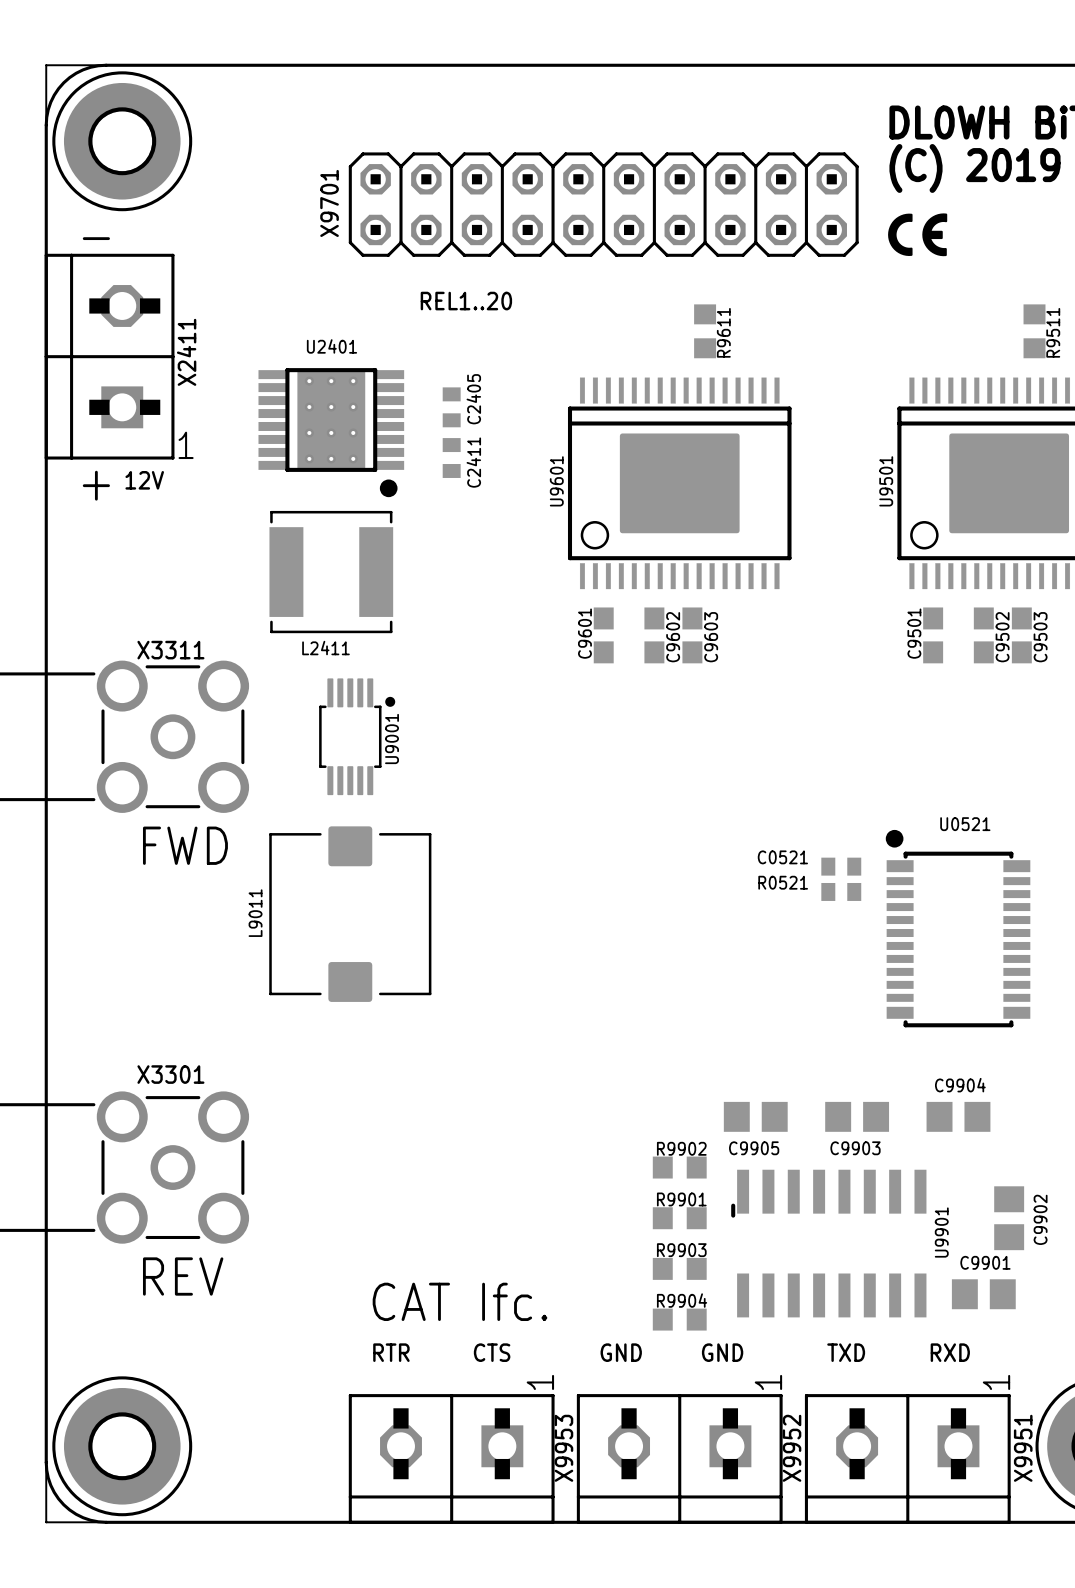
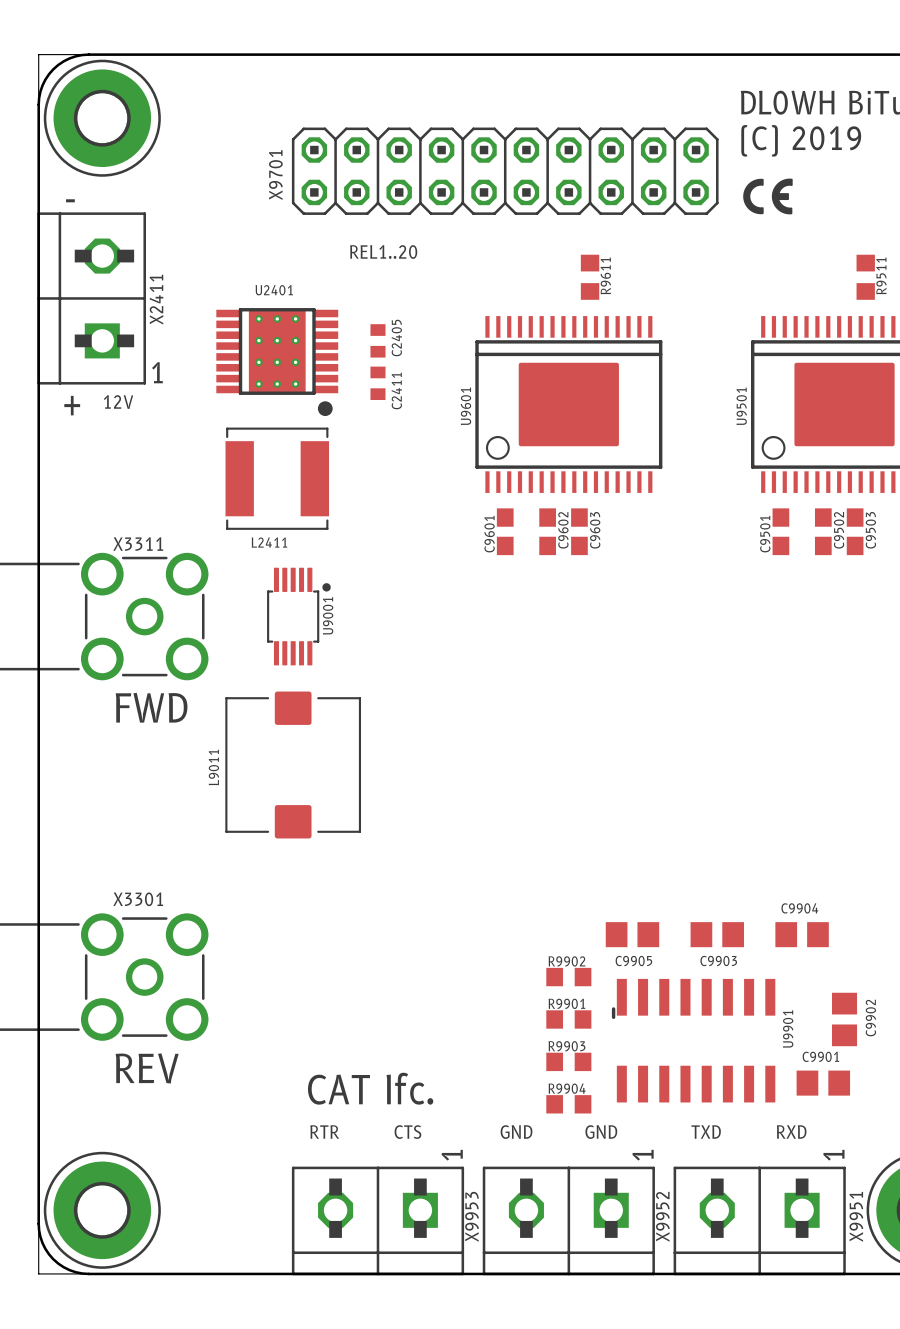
C0521: (841, 866) -> none
R0521: (841, 891) -> none
U0521: (958, 928) -> none

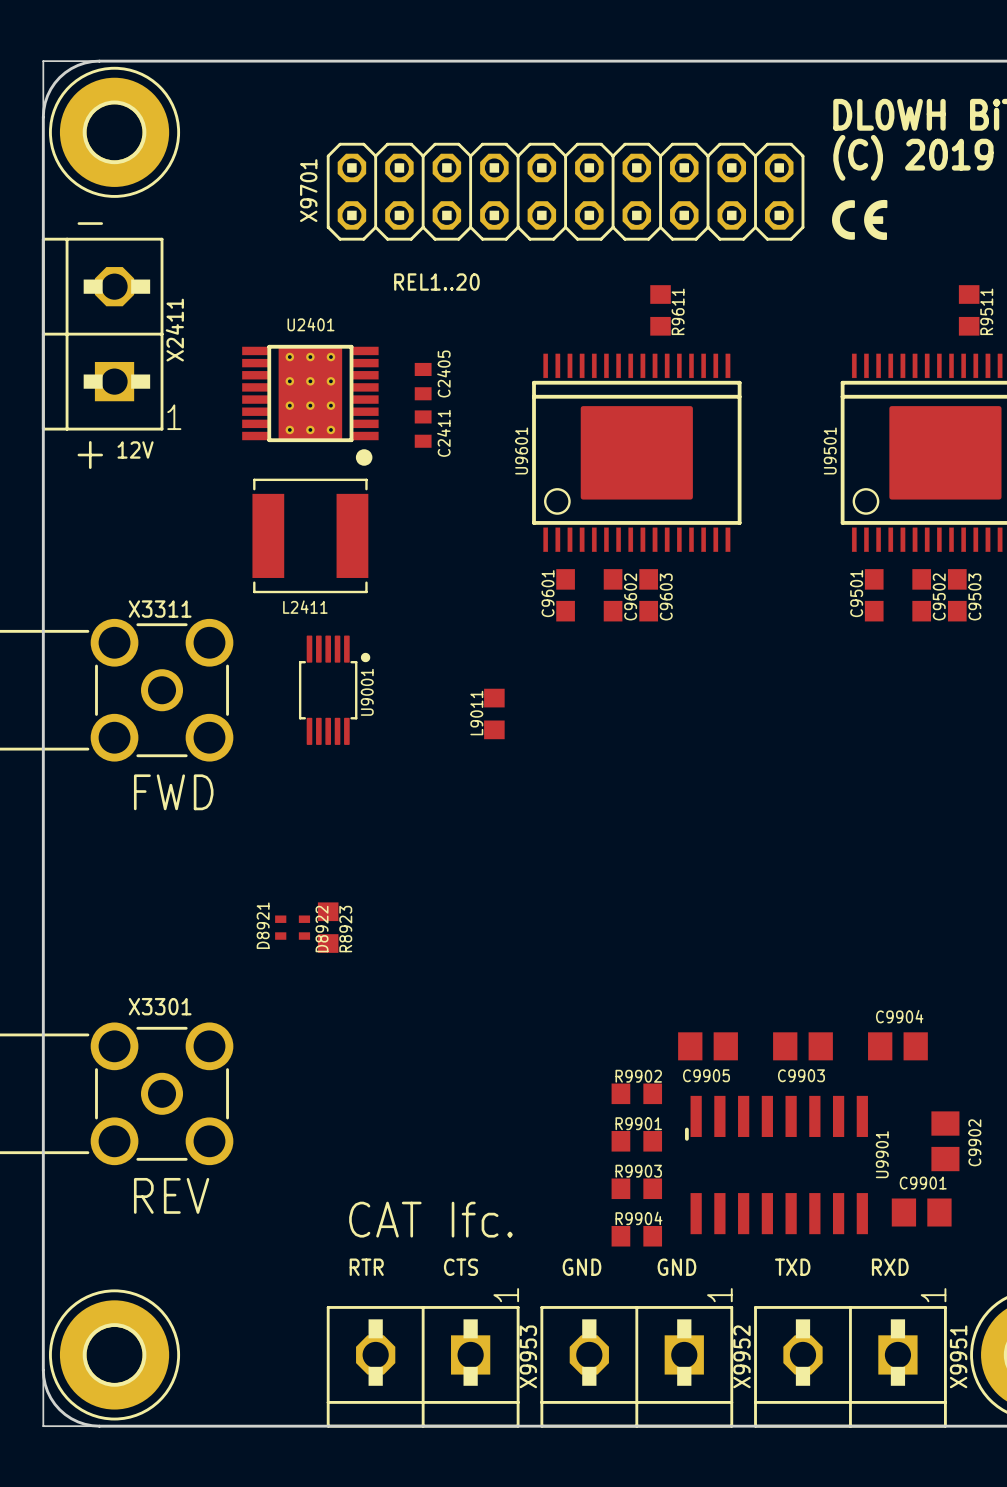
L9011 footprint: [225, 691, 362, 839] -> [484, 688, 505, 740]
L9011 name position: L9011 (213, 767) -> L9011 (476, 713)
D8921: none -> (280, 927)
D8922: none -> (304, 927)
R8923: none -> (328, 927)

